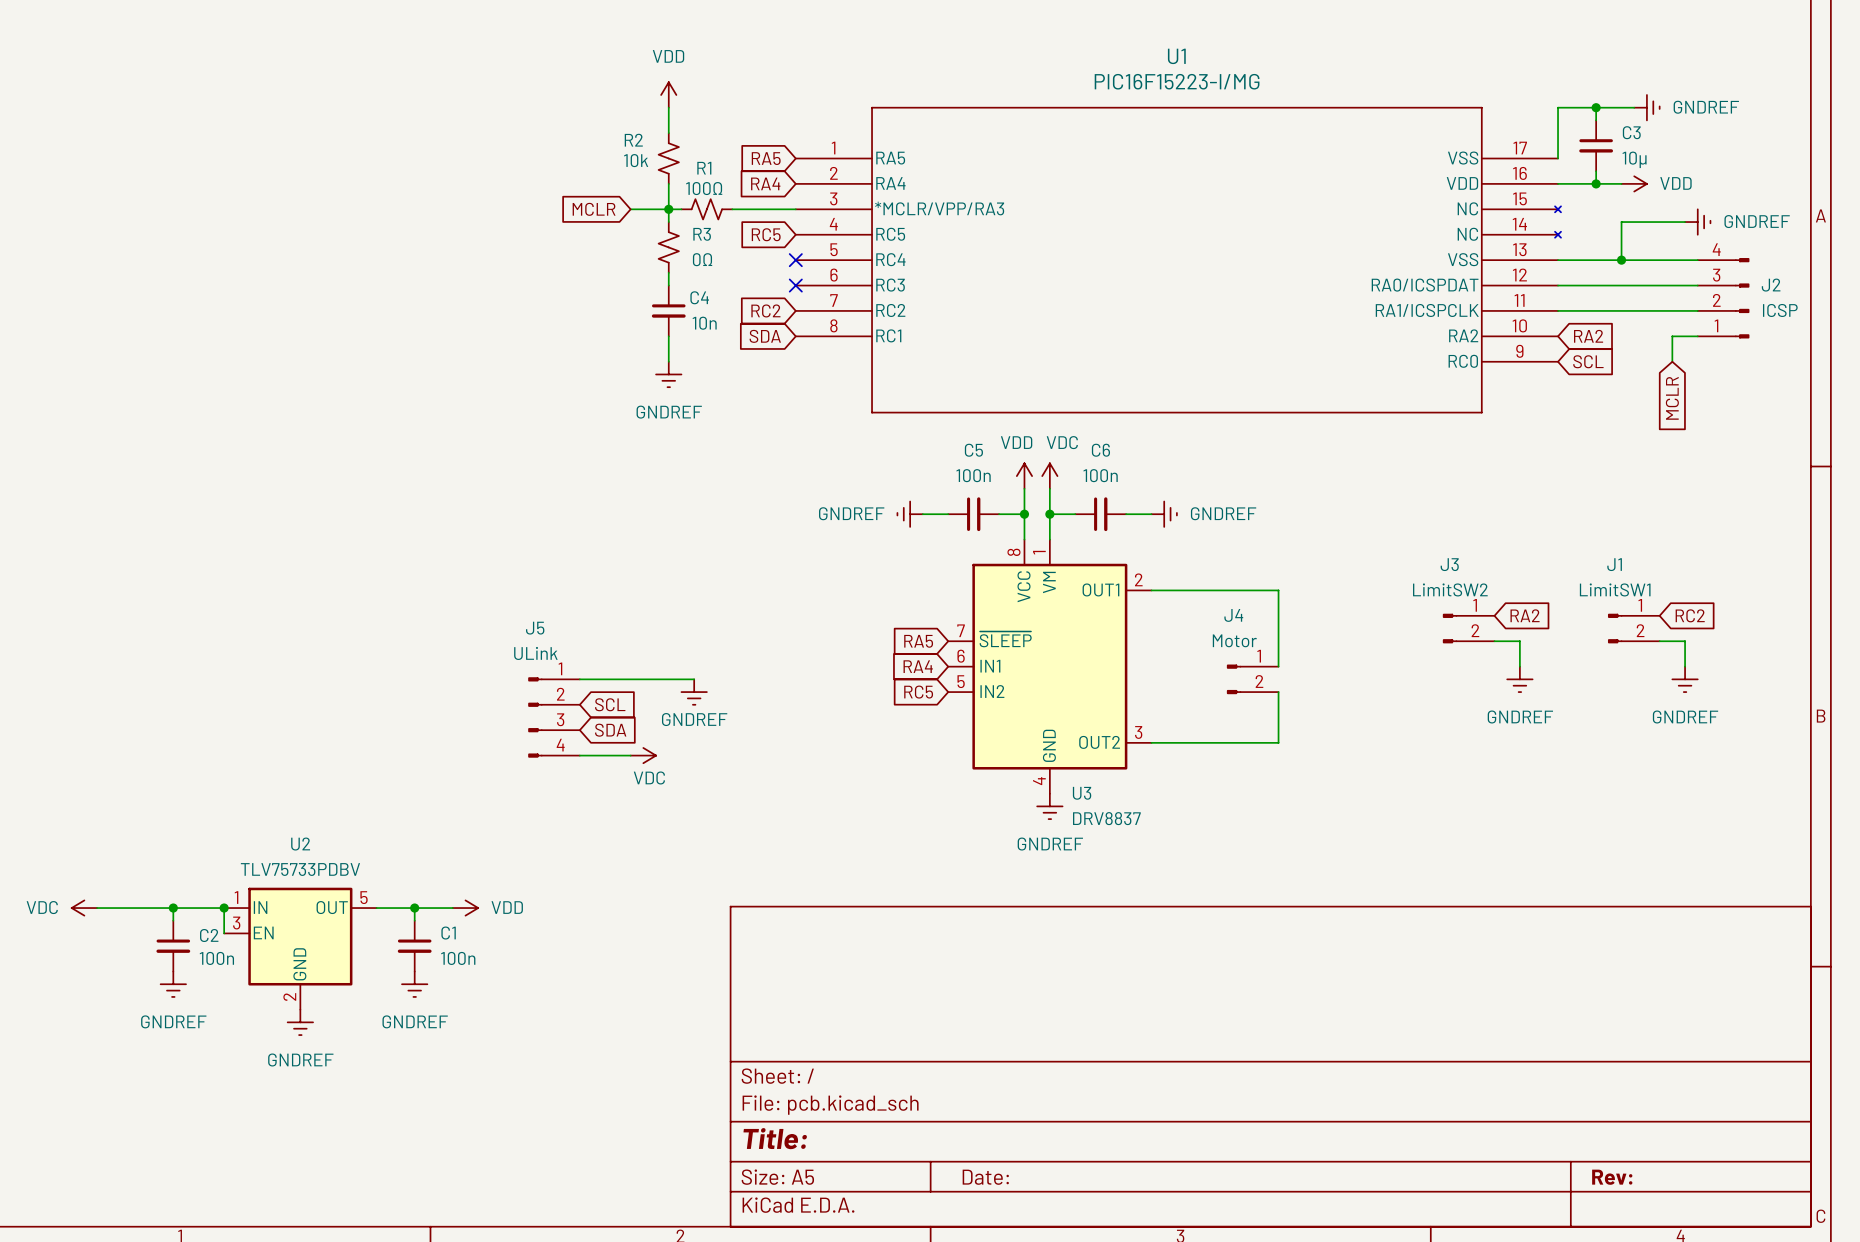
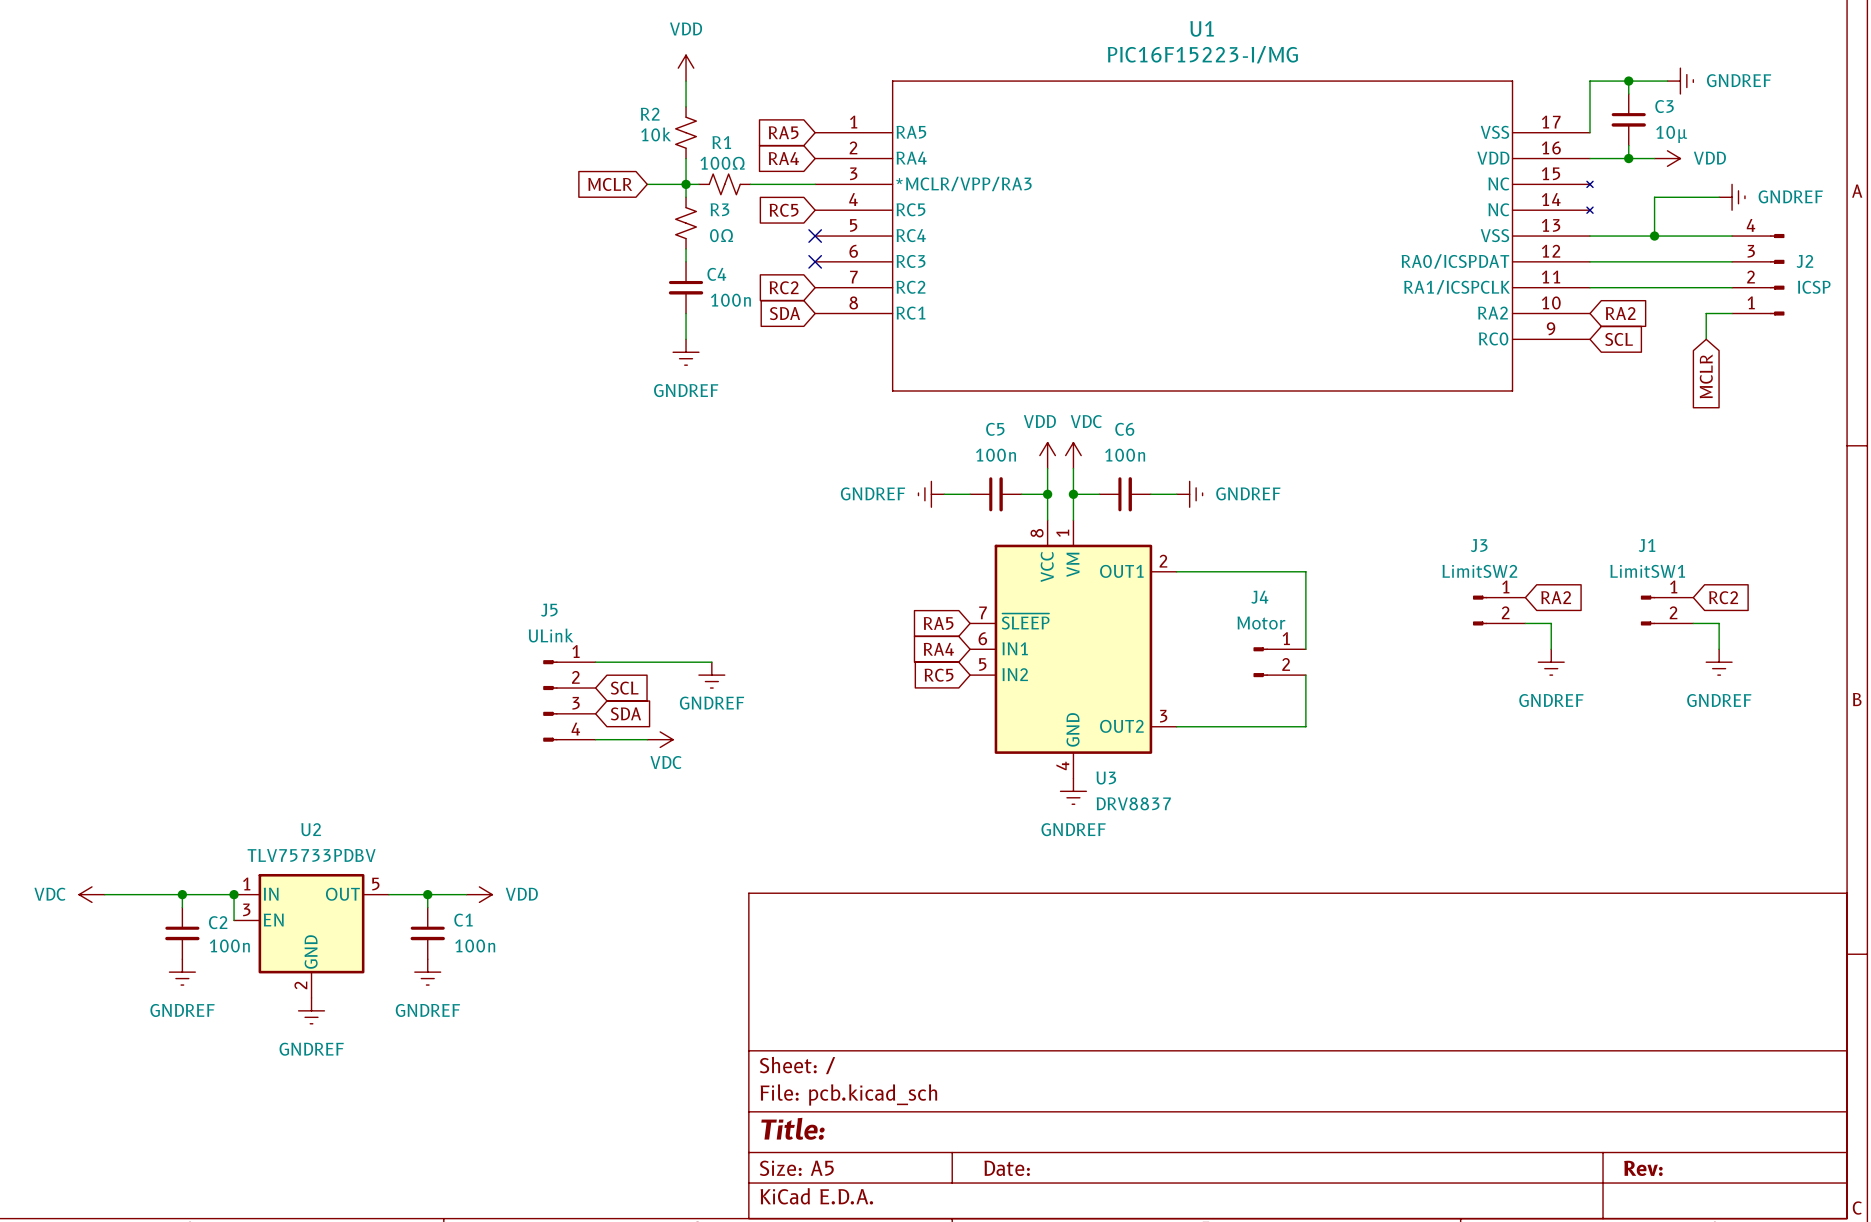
C4 value: 10n (704, 323) -> 100n (730, 300)

